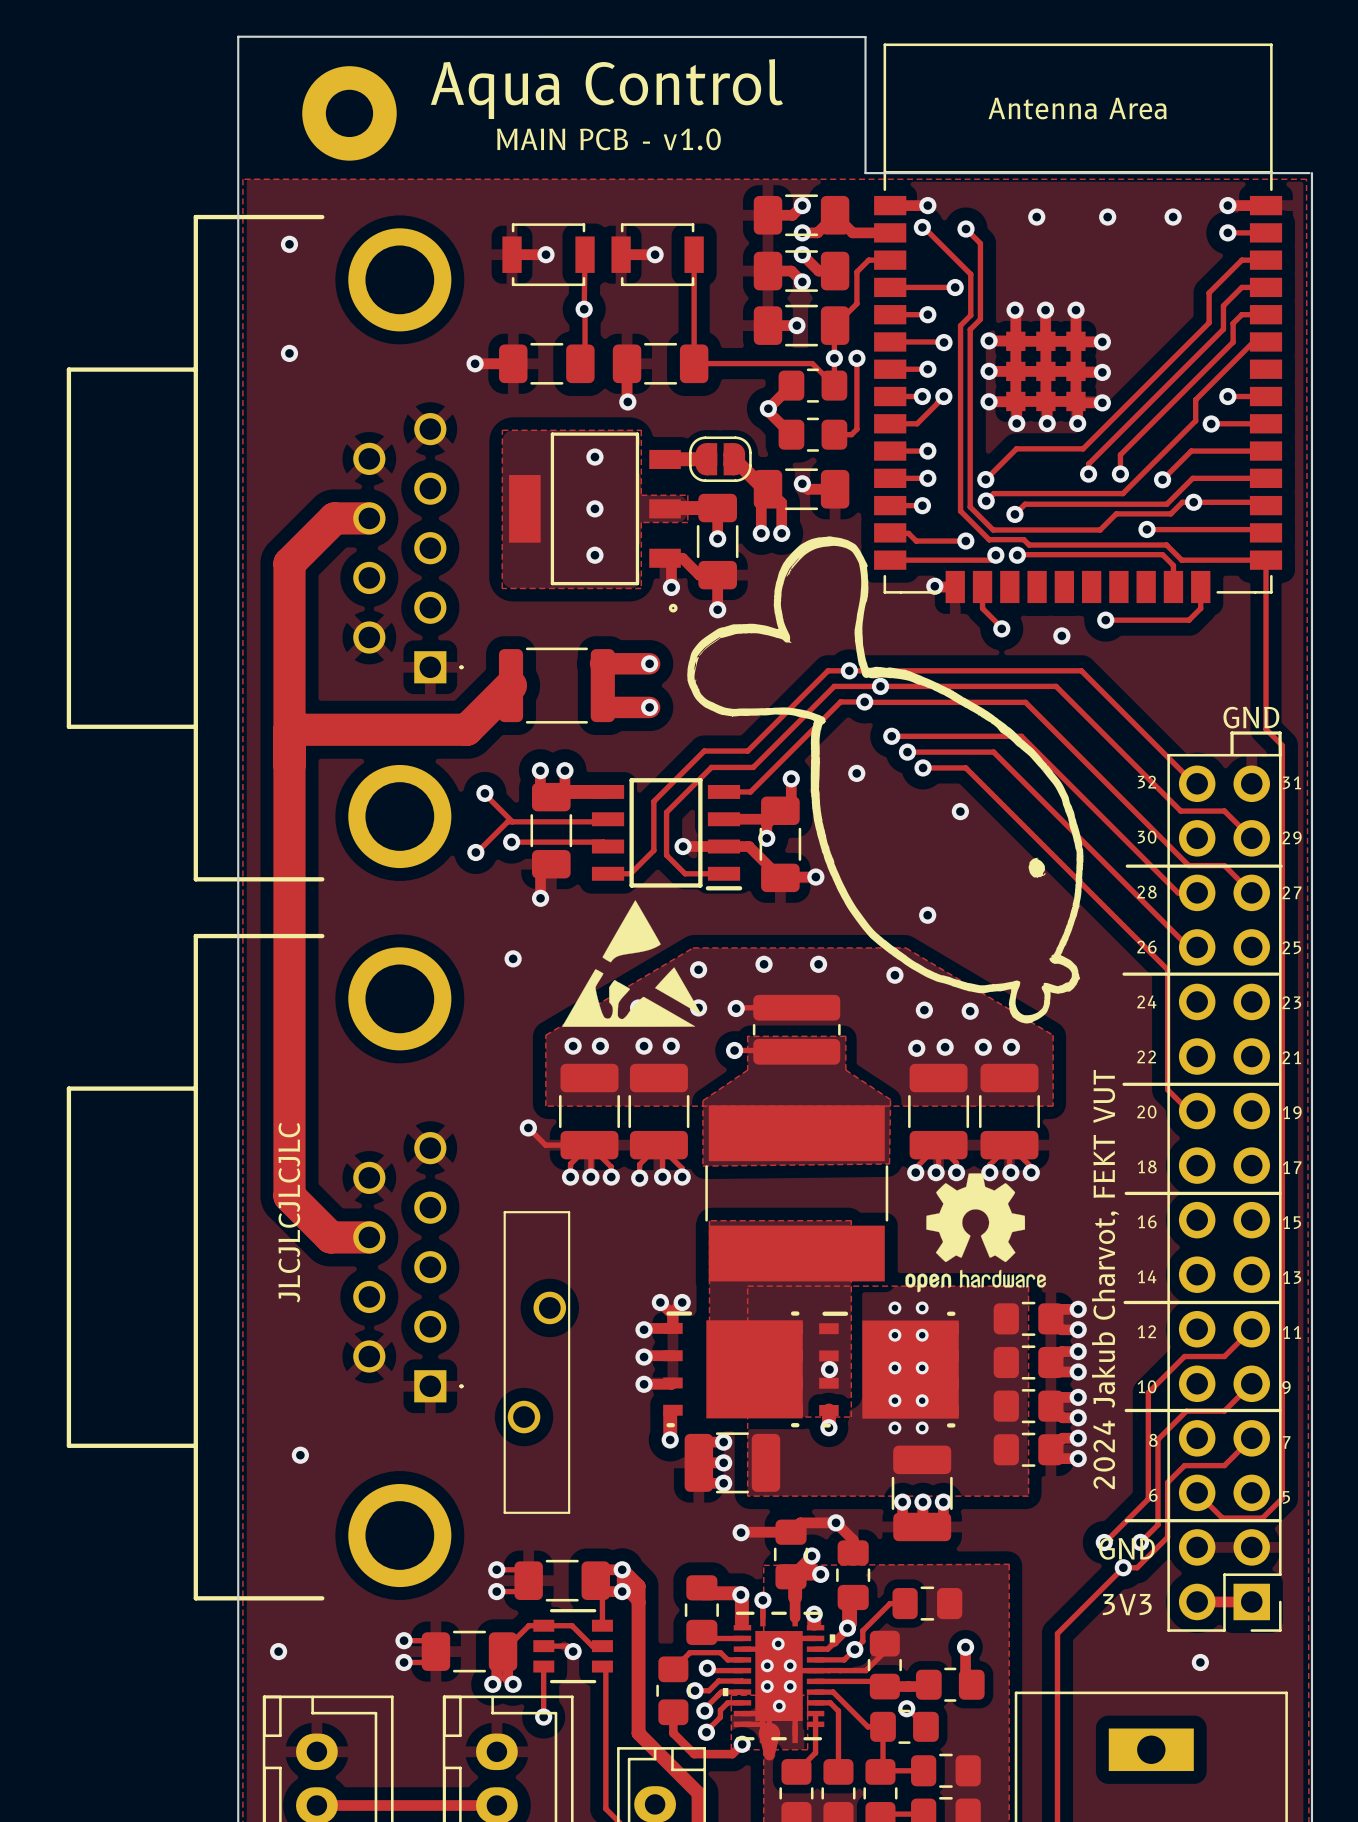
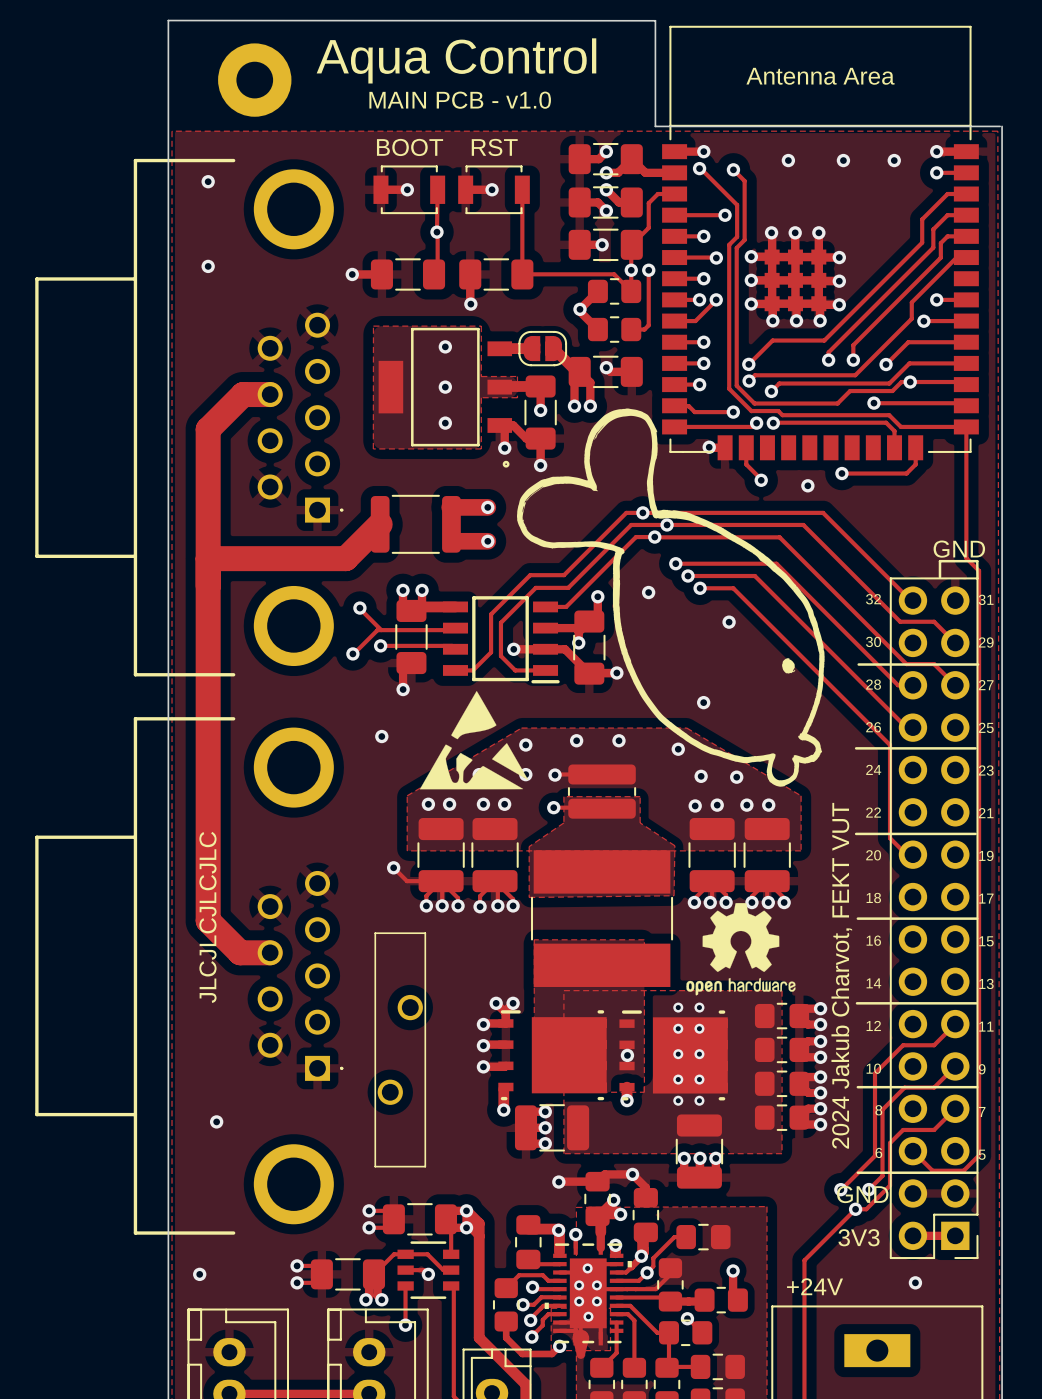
BOOT name: none -> BOOT (410, 147)
RST name: none -> RST (494, 147)
text: none -> +24V (815, 1286)

